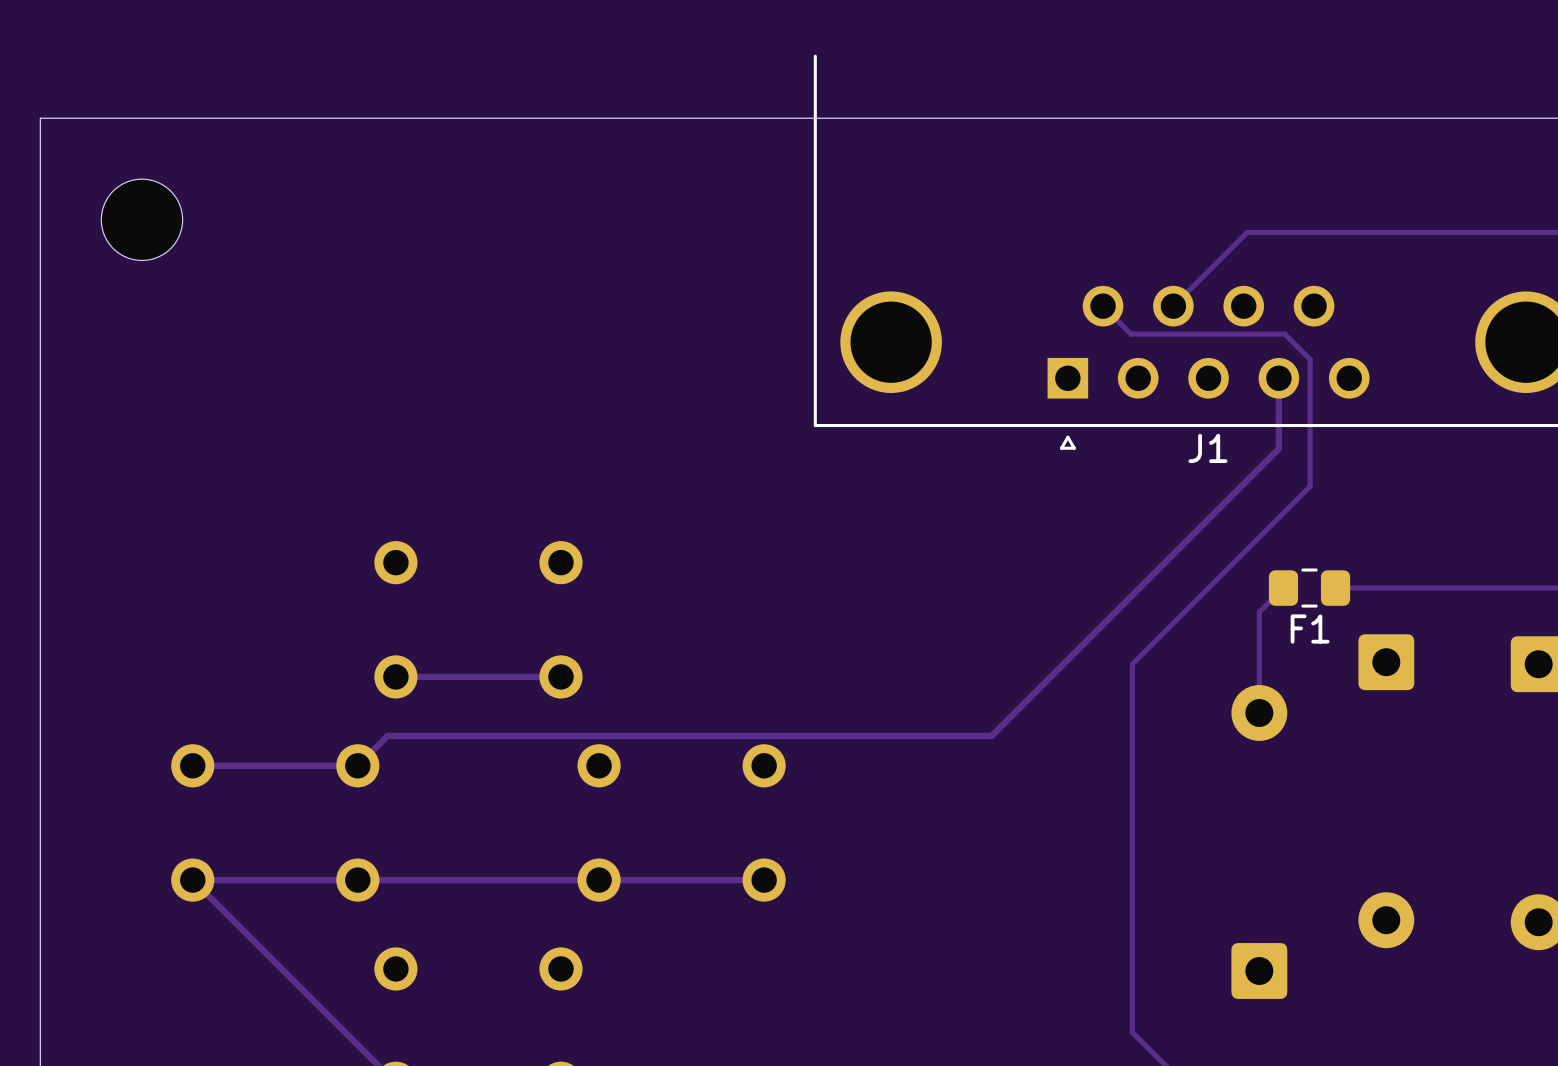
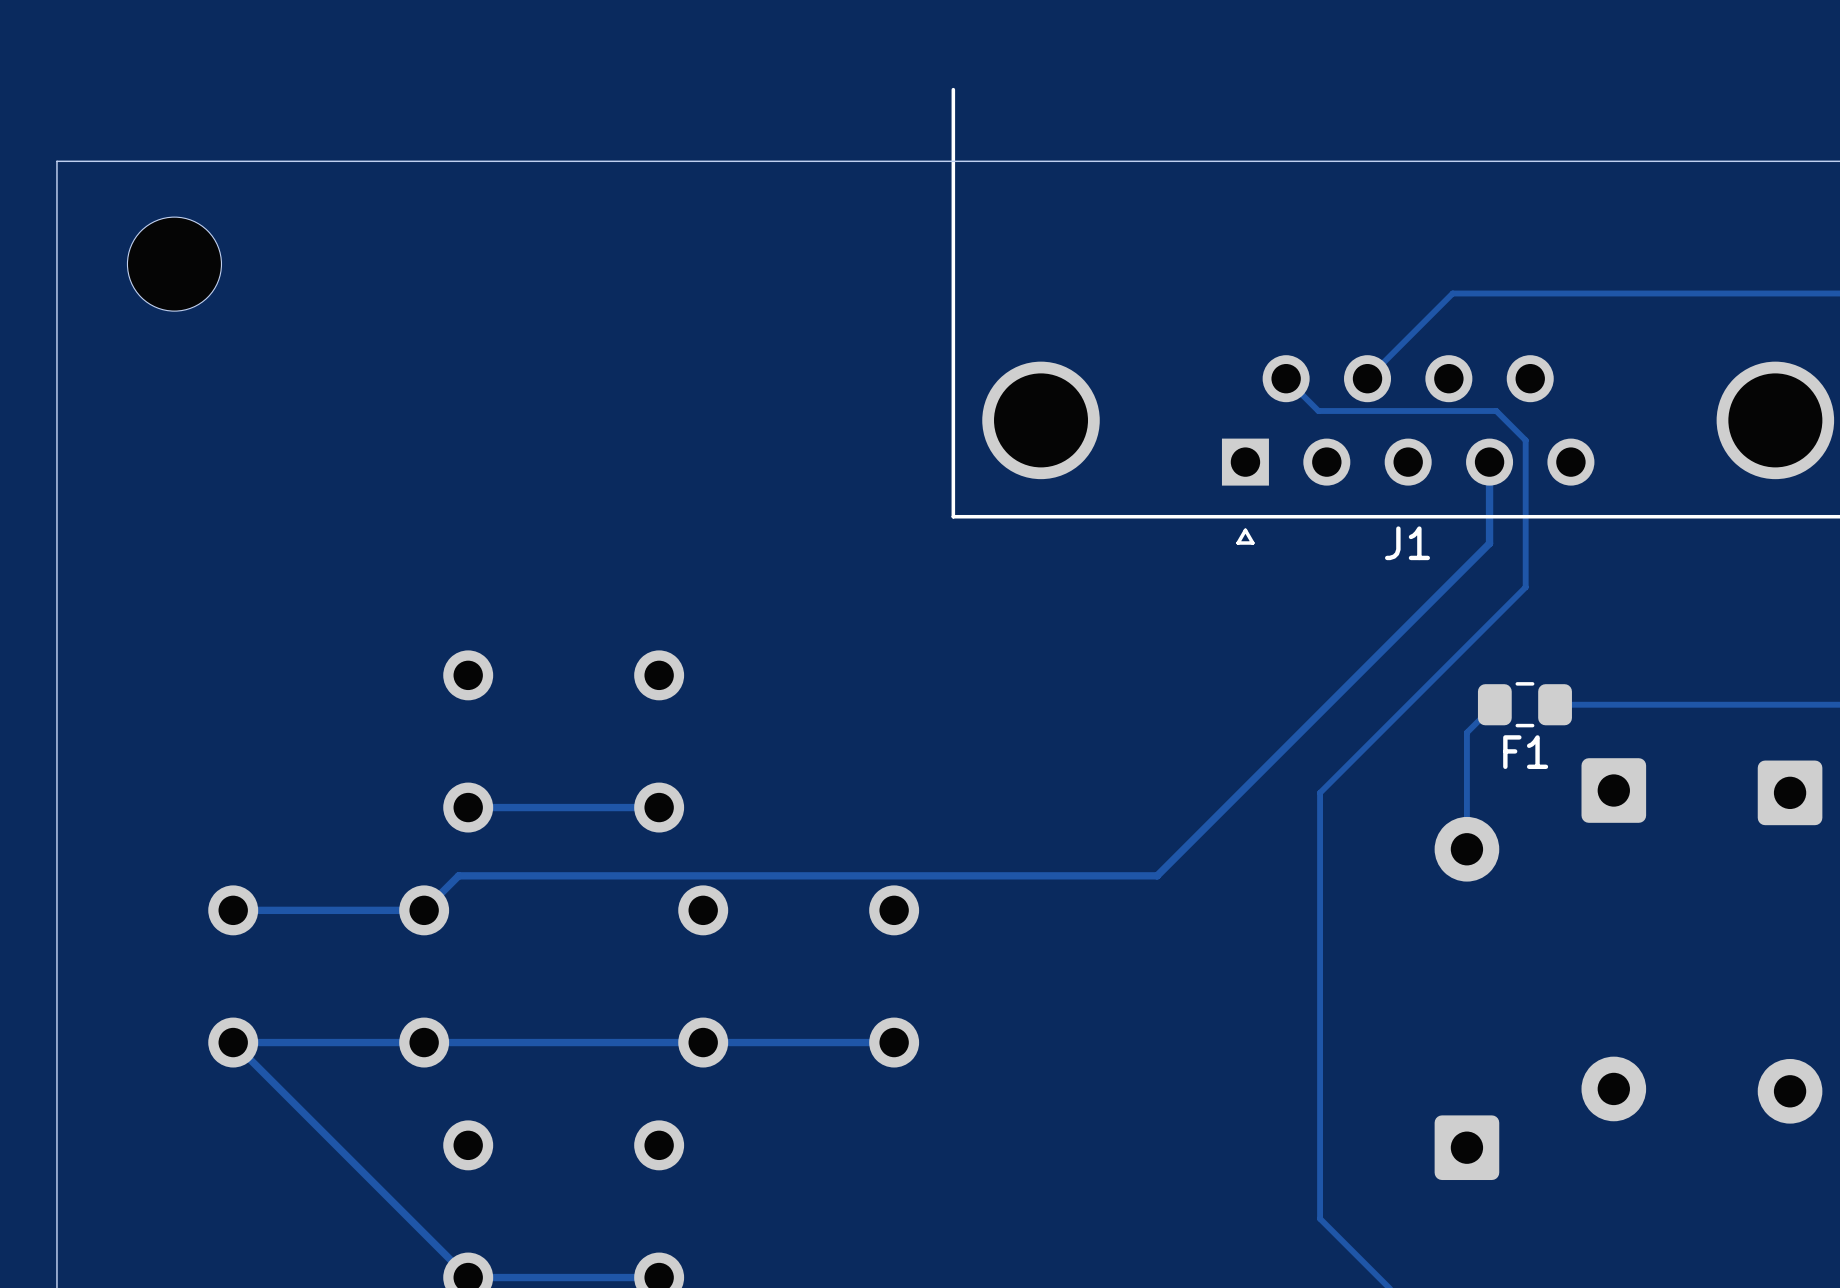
part position: (141, 219) -> (174, 264)

